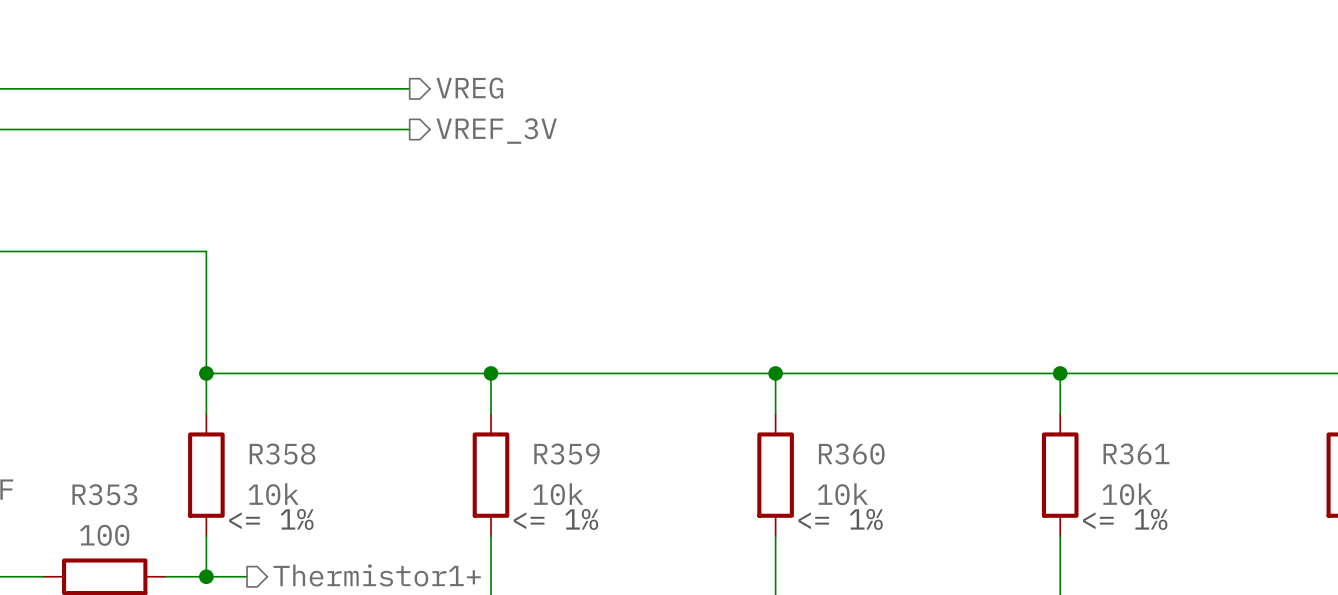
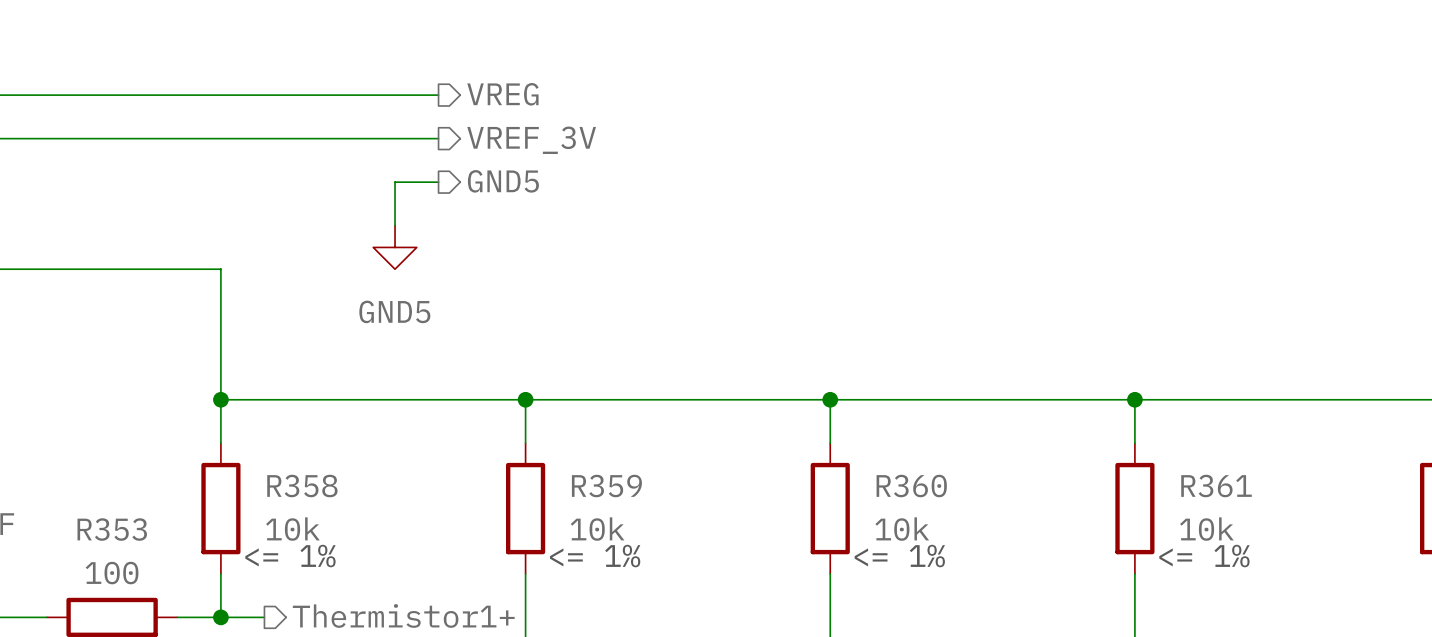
hierarchical label: none -> GND5 (503, 181)
wire: none -> (438, 182) (395, 182) (395, 225)
power symbol: none -> GND5 (395, 247)

